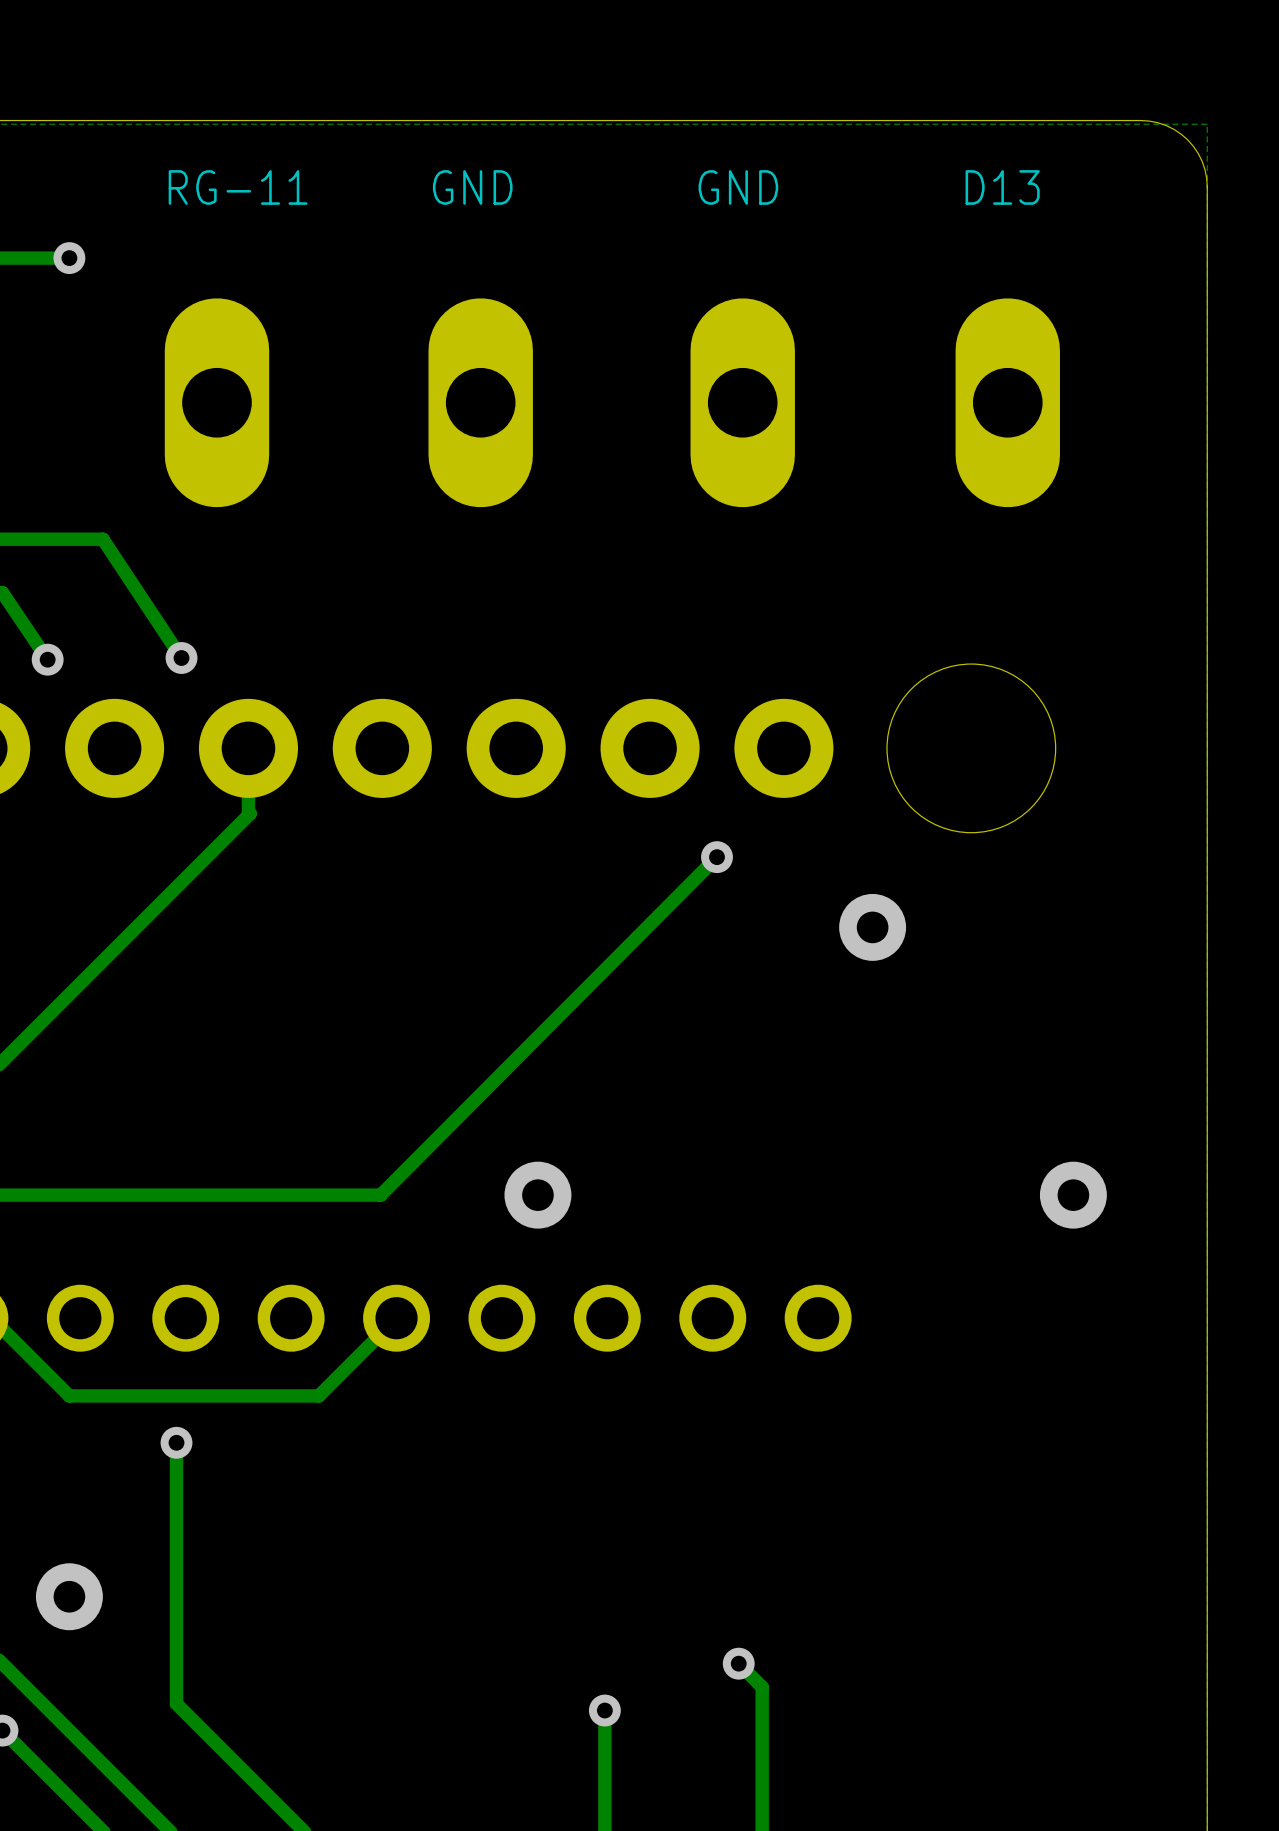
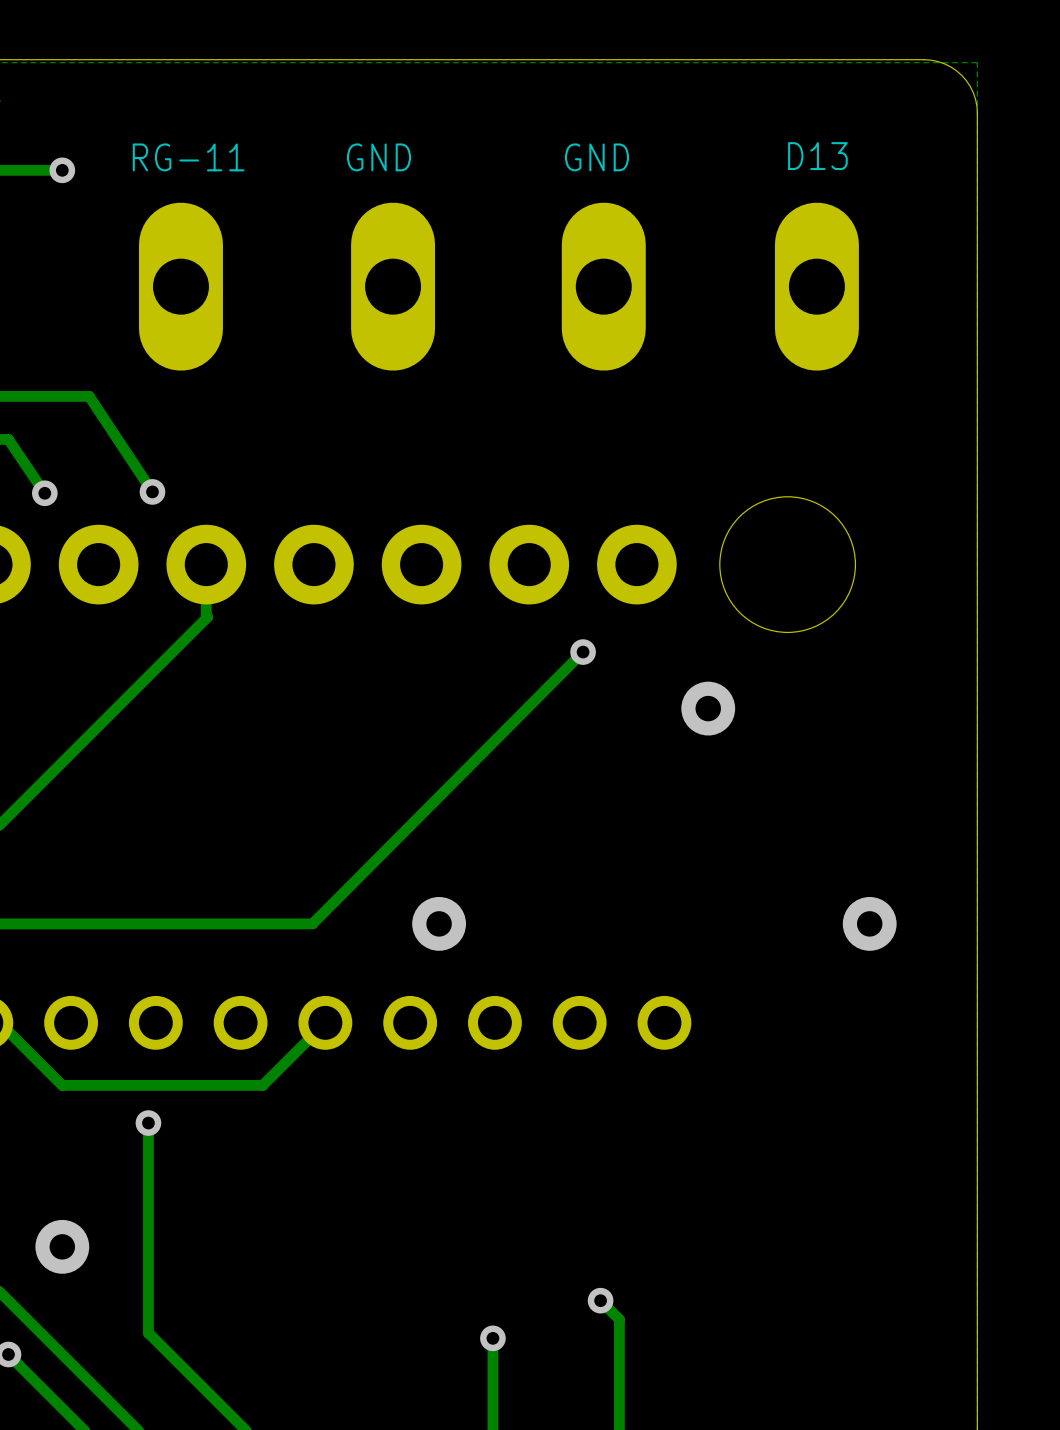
text position: RG-11 (238, 187) -> RG-11 (188, 157)
text position: GND (472, 187) -> GND (379, 157)
text position: GND (738, 187) -> GND (597, 157)
text position: D13 (1002, 187) -> D13 (817, 156)

